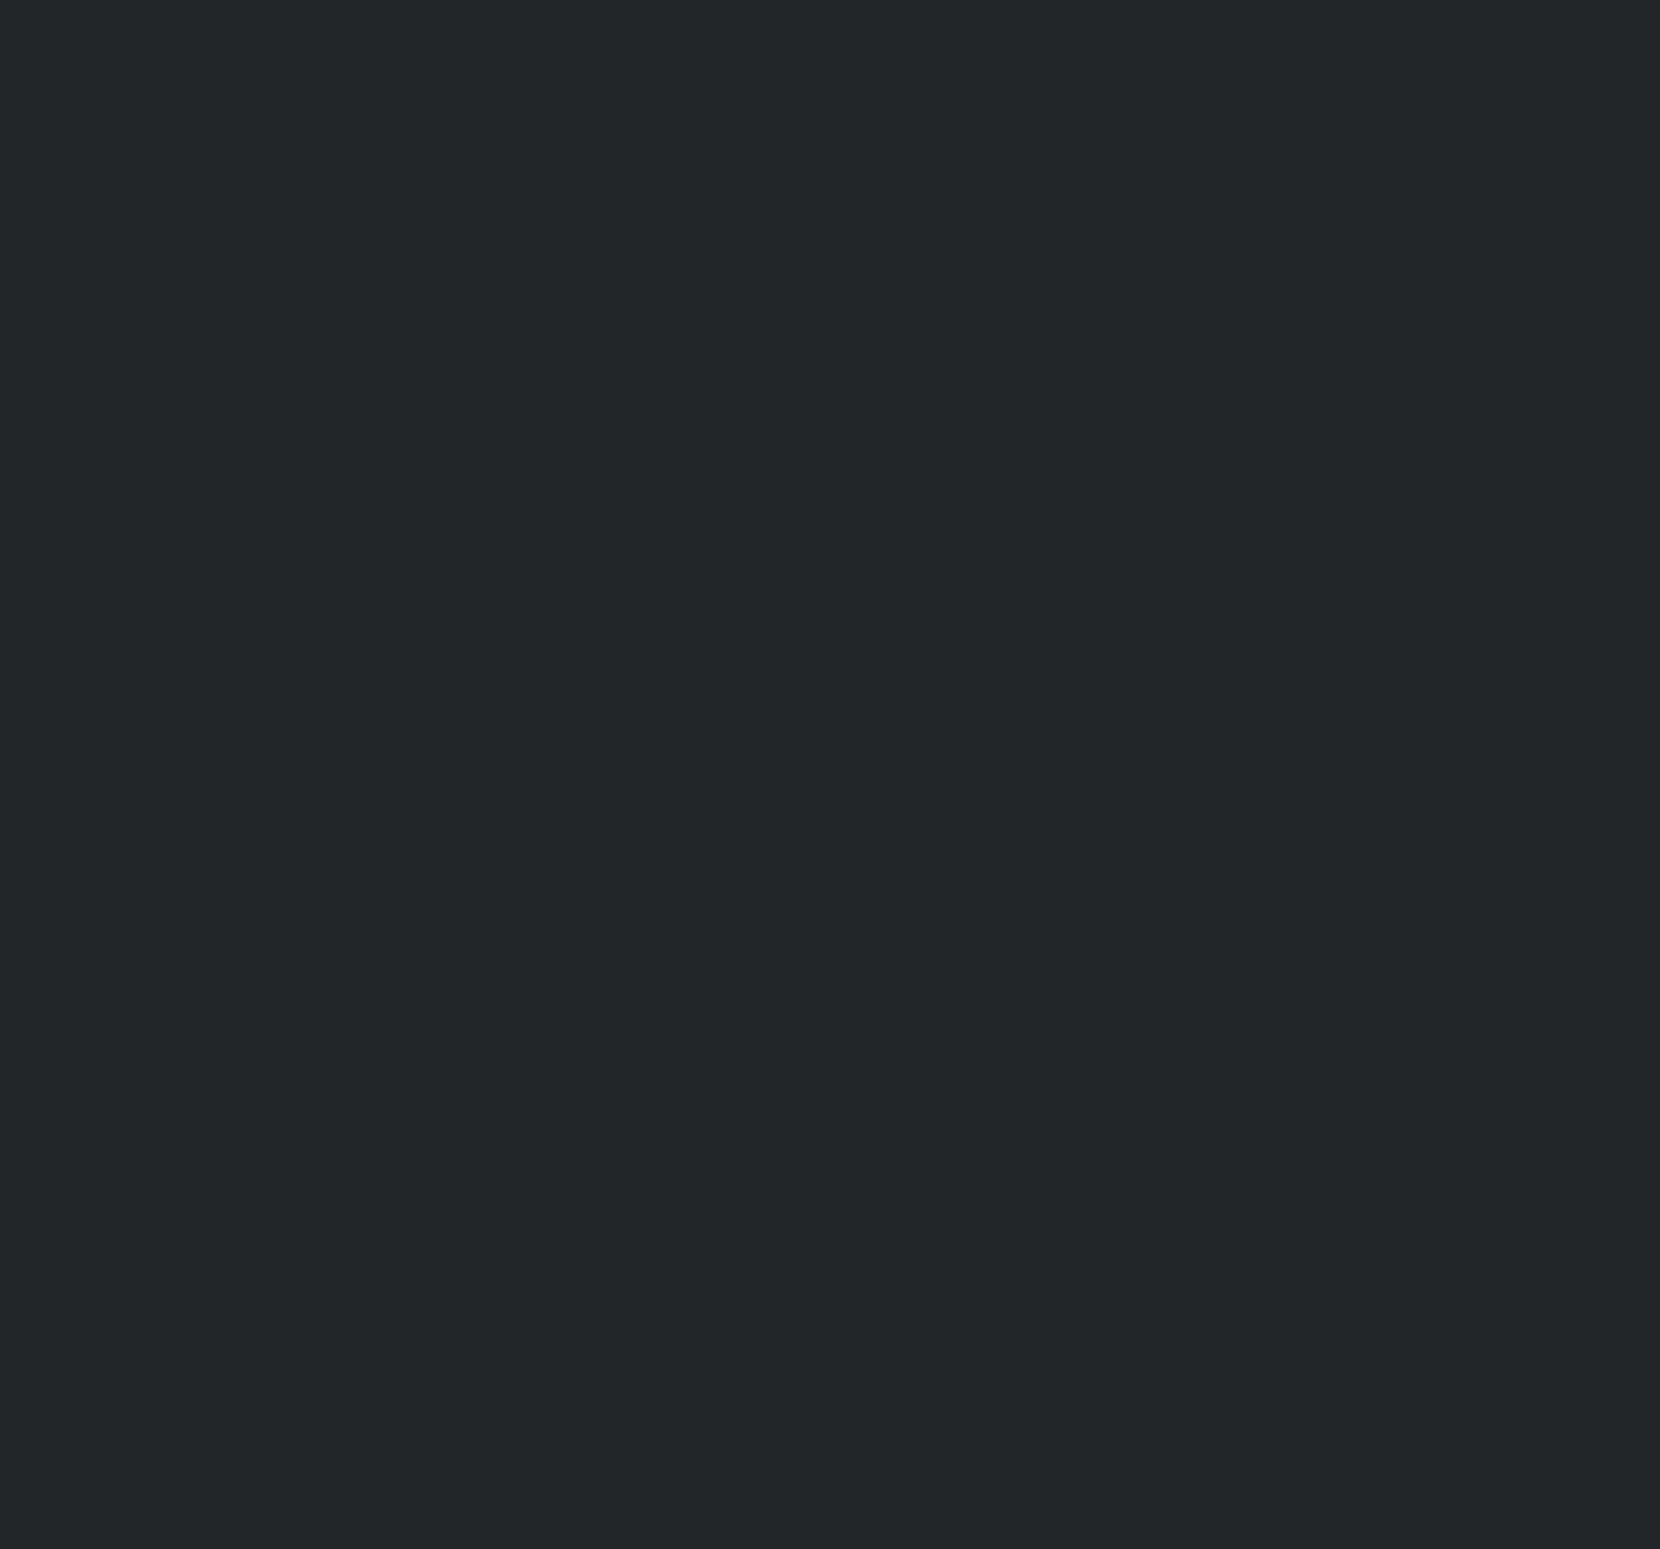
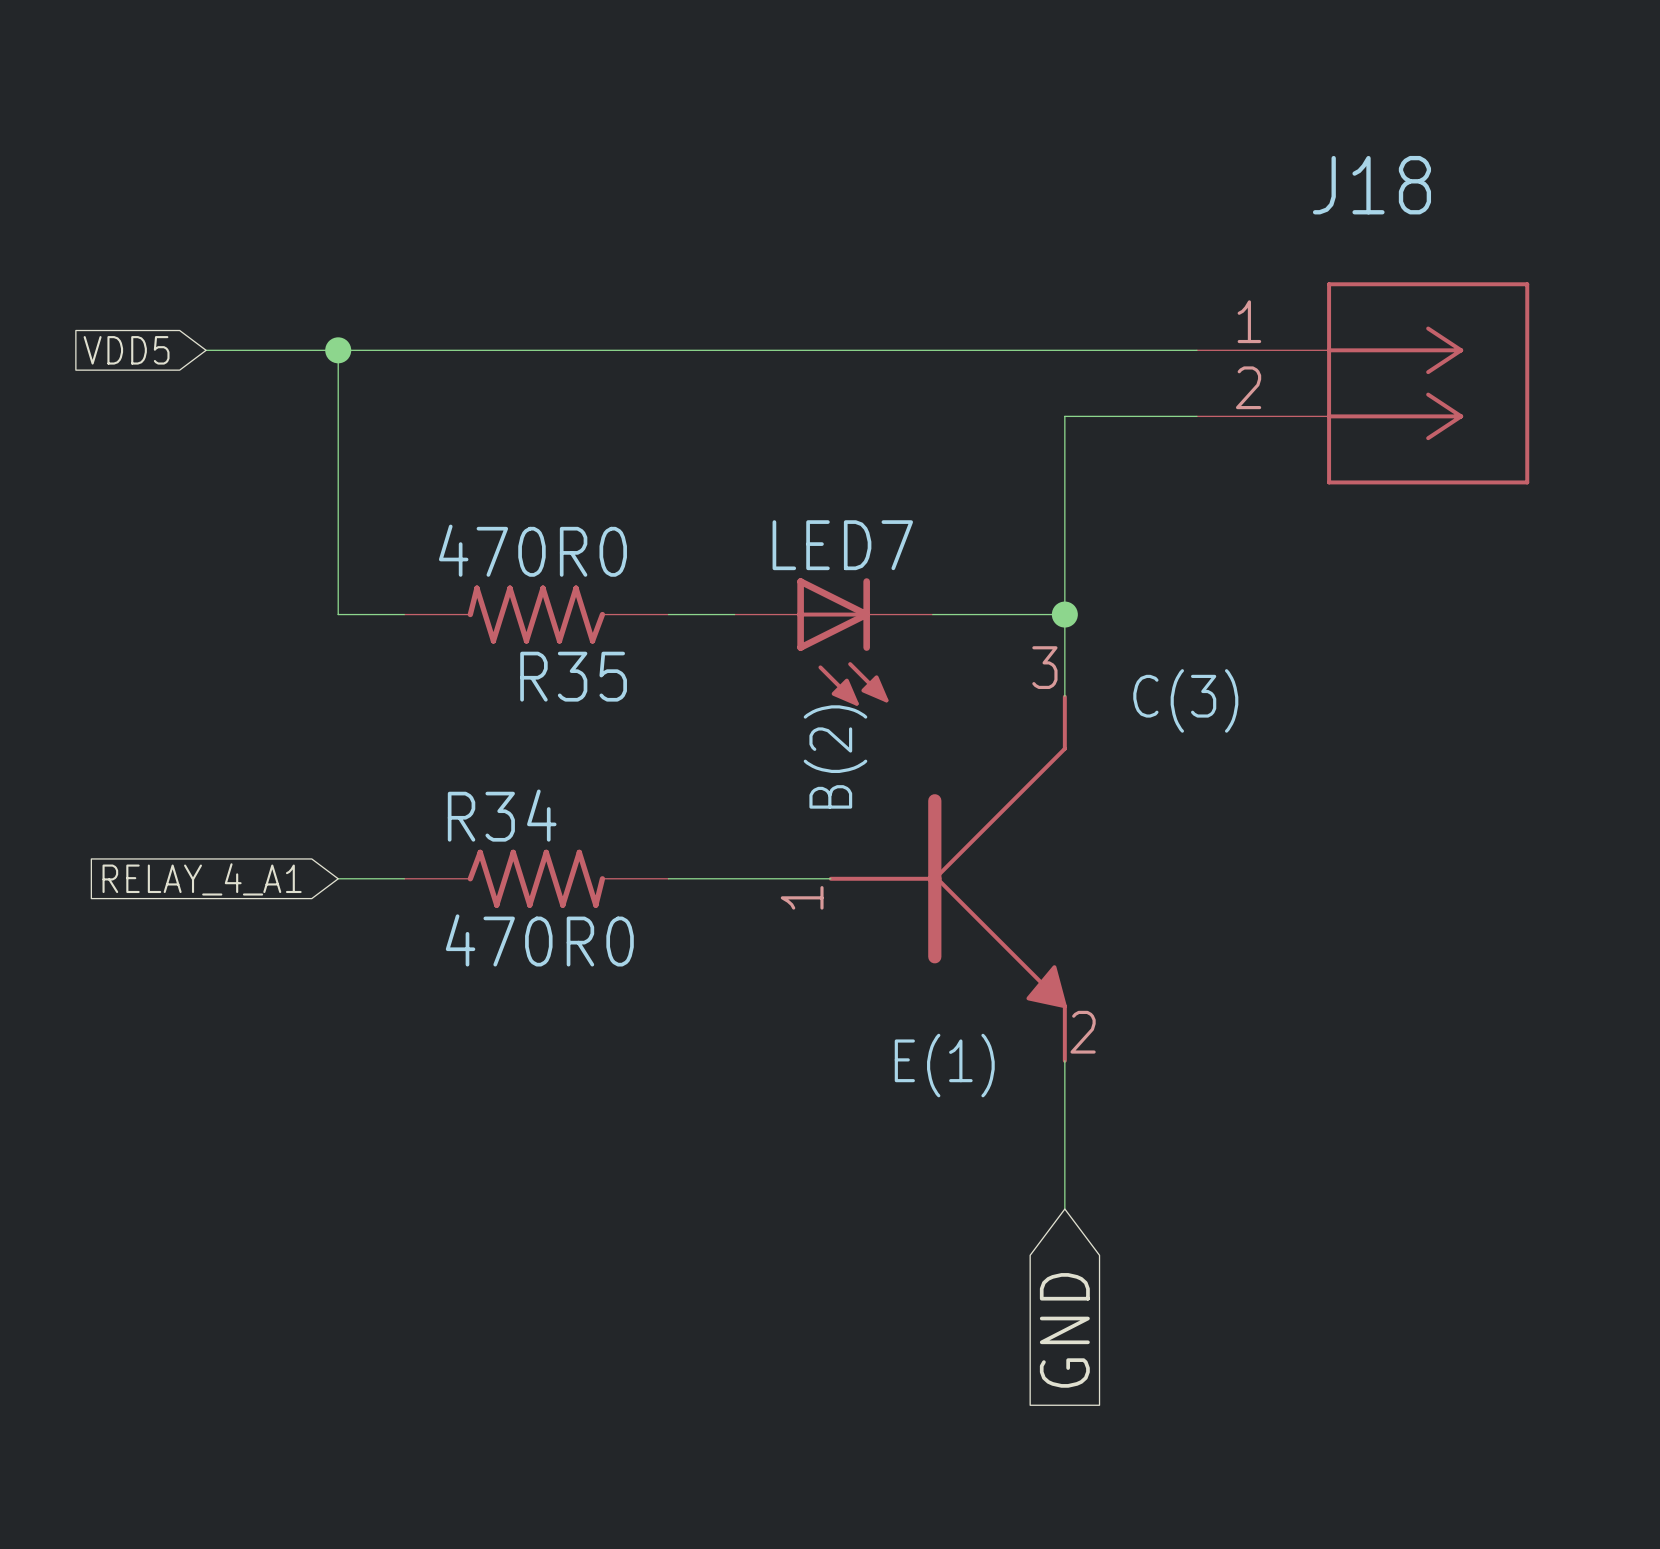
global label: none -> VDD5 (126, 350)
wire: none -> (206, 350) (1196, 350)
wire: none -> (338, 350) (338, 614) (404, 614)
junction: none -> (338, 350)
J18: none -> (1363, 383)
wire: none -> (1196, 416) (1064, 416) (1064, 696)
R35: none -> 470R0 (536, 614)
wire: none -> (668, 614) (734, 614)
wire: none -> (932, 614) (1064, 614)
junction: none -> (1064, 614)
LED7: none -> (833, 641)
wire: none -> (338, 878) (404, 878)
R34: none -> 470R0 (536, 878)
wire: none -> (668, 878) (830, 878)
part: none -> (947, 878)
global label: none -> RELAY_4_A1 (202, 879)
wire: none -> (1064, 1060) (1064, 1209)
global label: none -> GND (1064, 1330)

